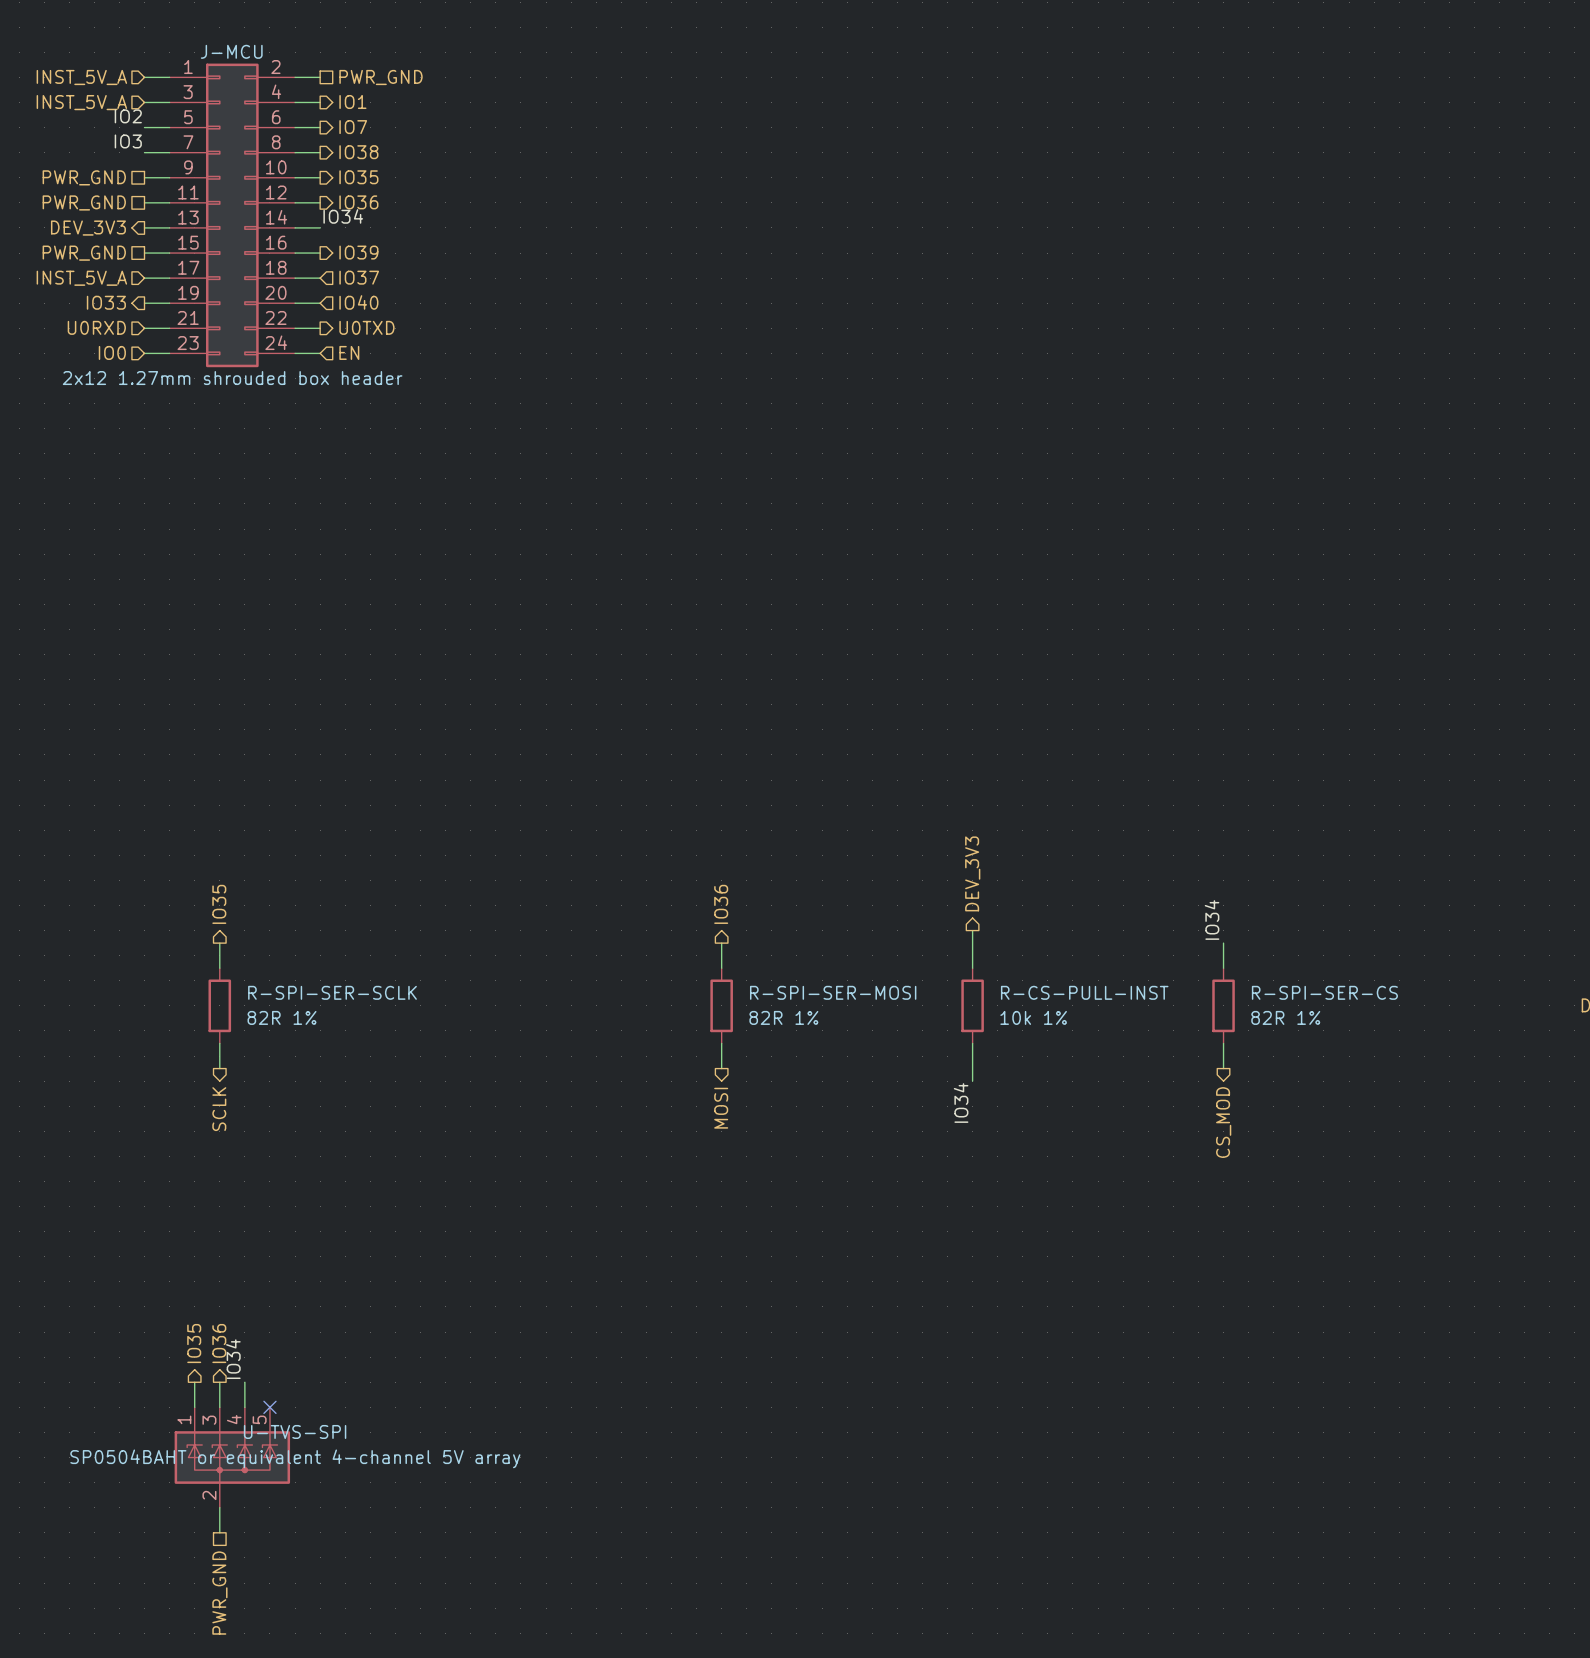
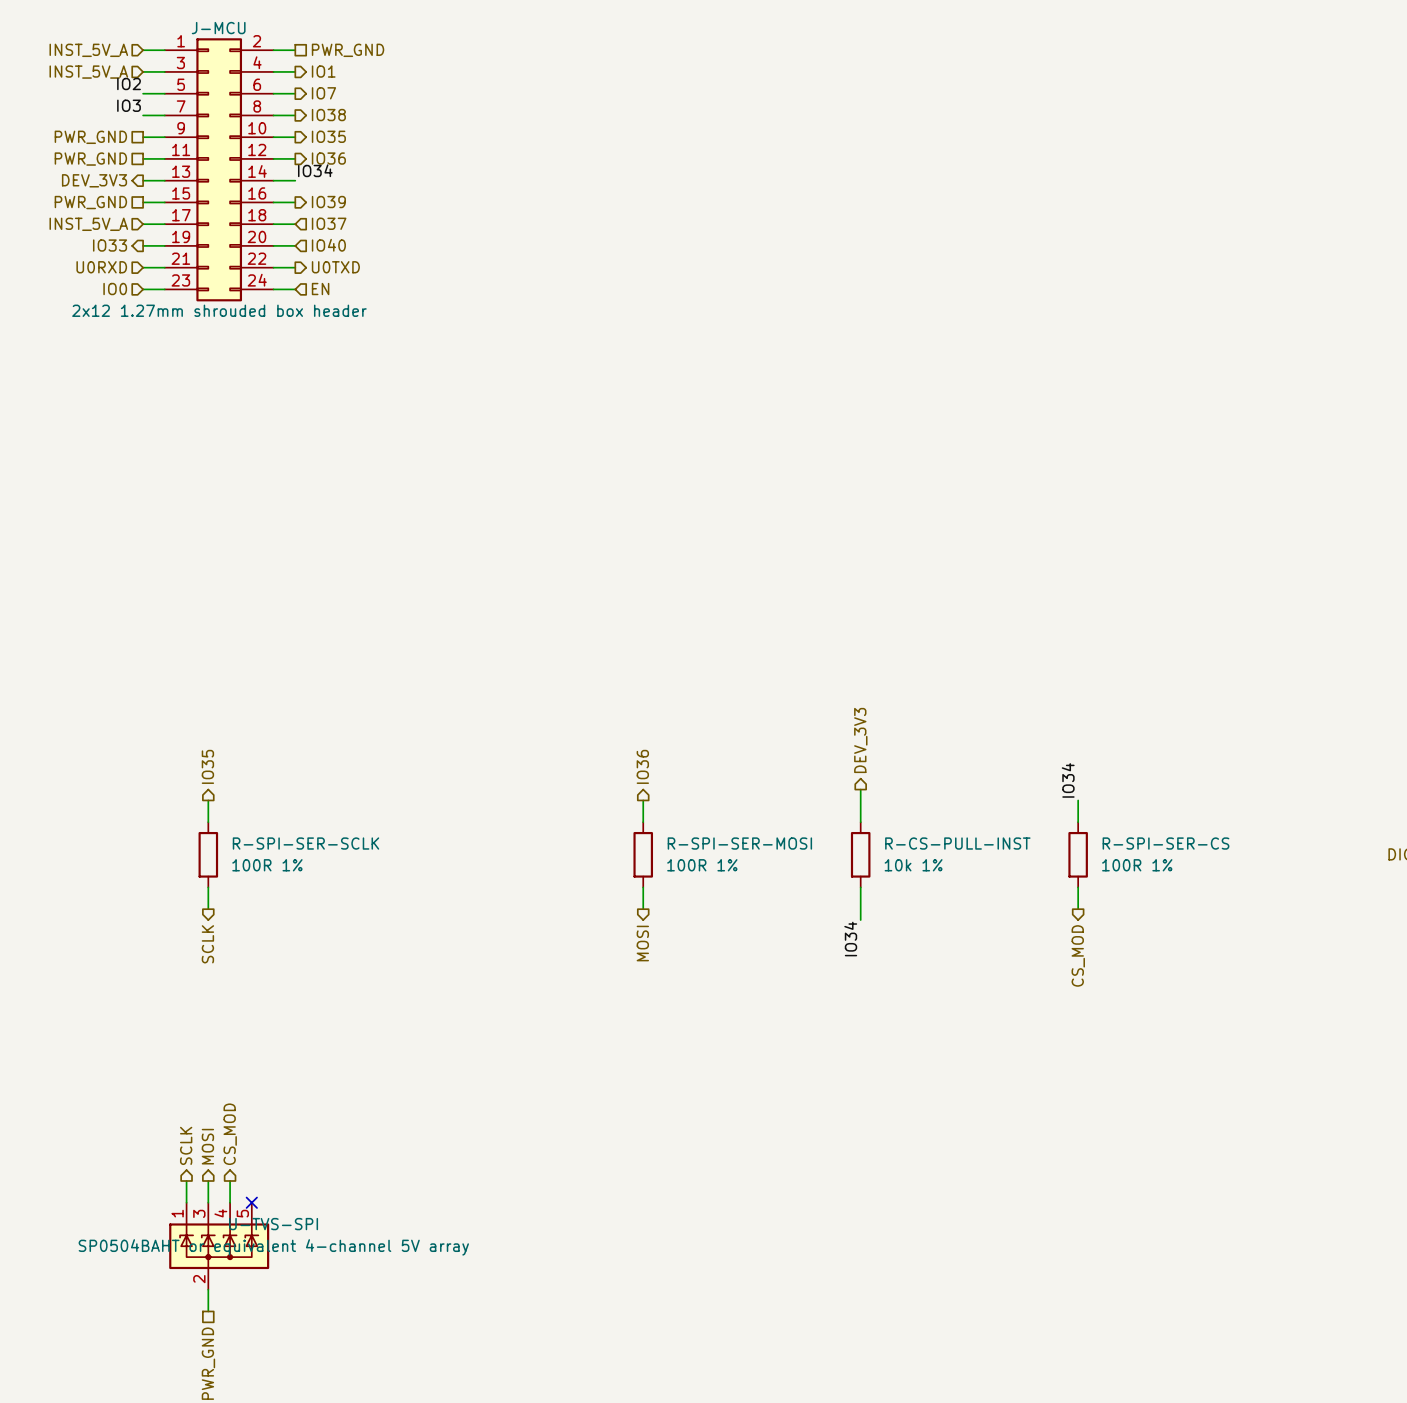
R-SPI-SER-SCLK value: 82R 1% (282, 1017) -> 100R 1% (267, 865)
R-SPI-SER-MOSI value: 82R 1% (783, 1017) -> 100R 1% (702, 865)
R-SPI-SER-CS value: 82R 1% (1285, 1017) -> 100R 1% (1137, 865)
hierarchical label: none -> CS_MOD (230, 1134)
hierarchical label: IO35 (194, 1343) -> SCLK (186, 1145)
hierarchical label: IO36 (219, 1343) -> MOSI (207, 1146)
label: IO34 (233, 1359) -> none

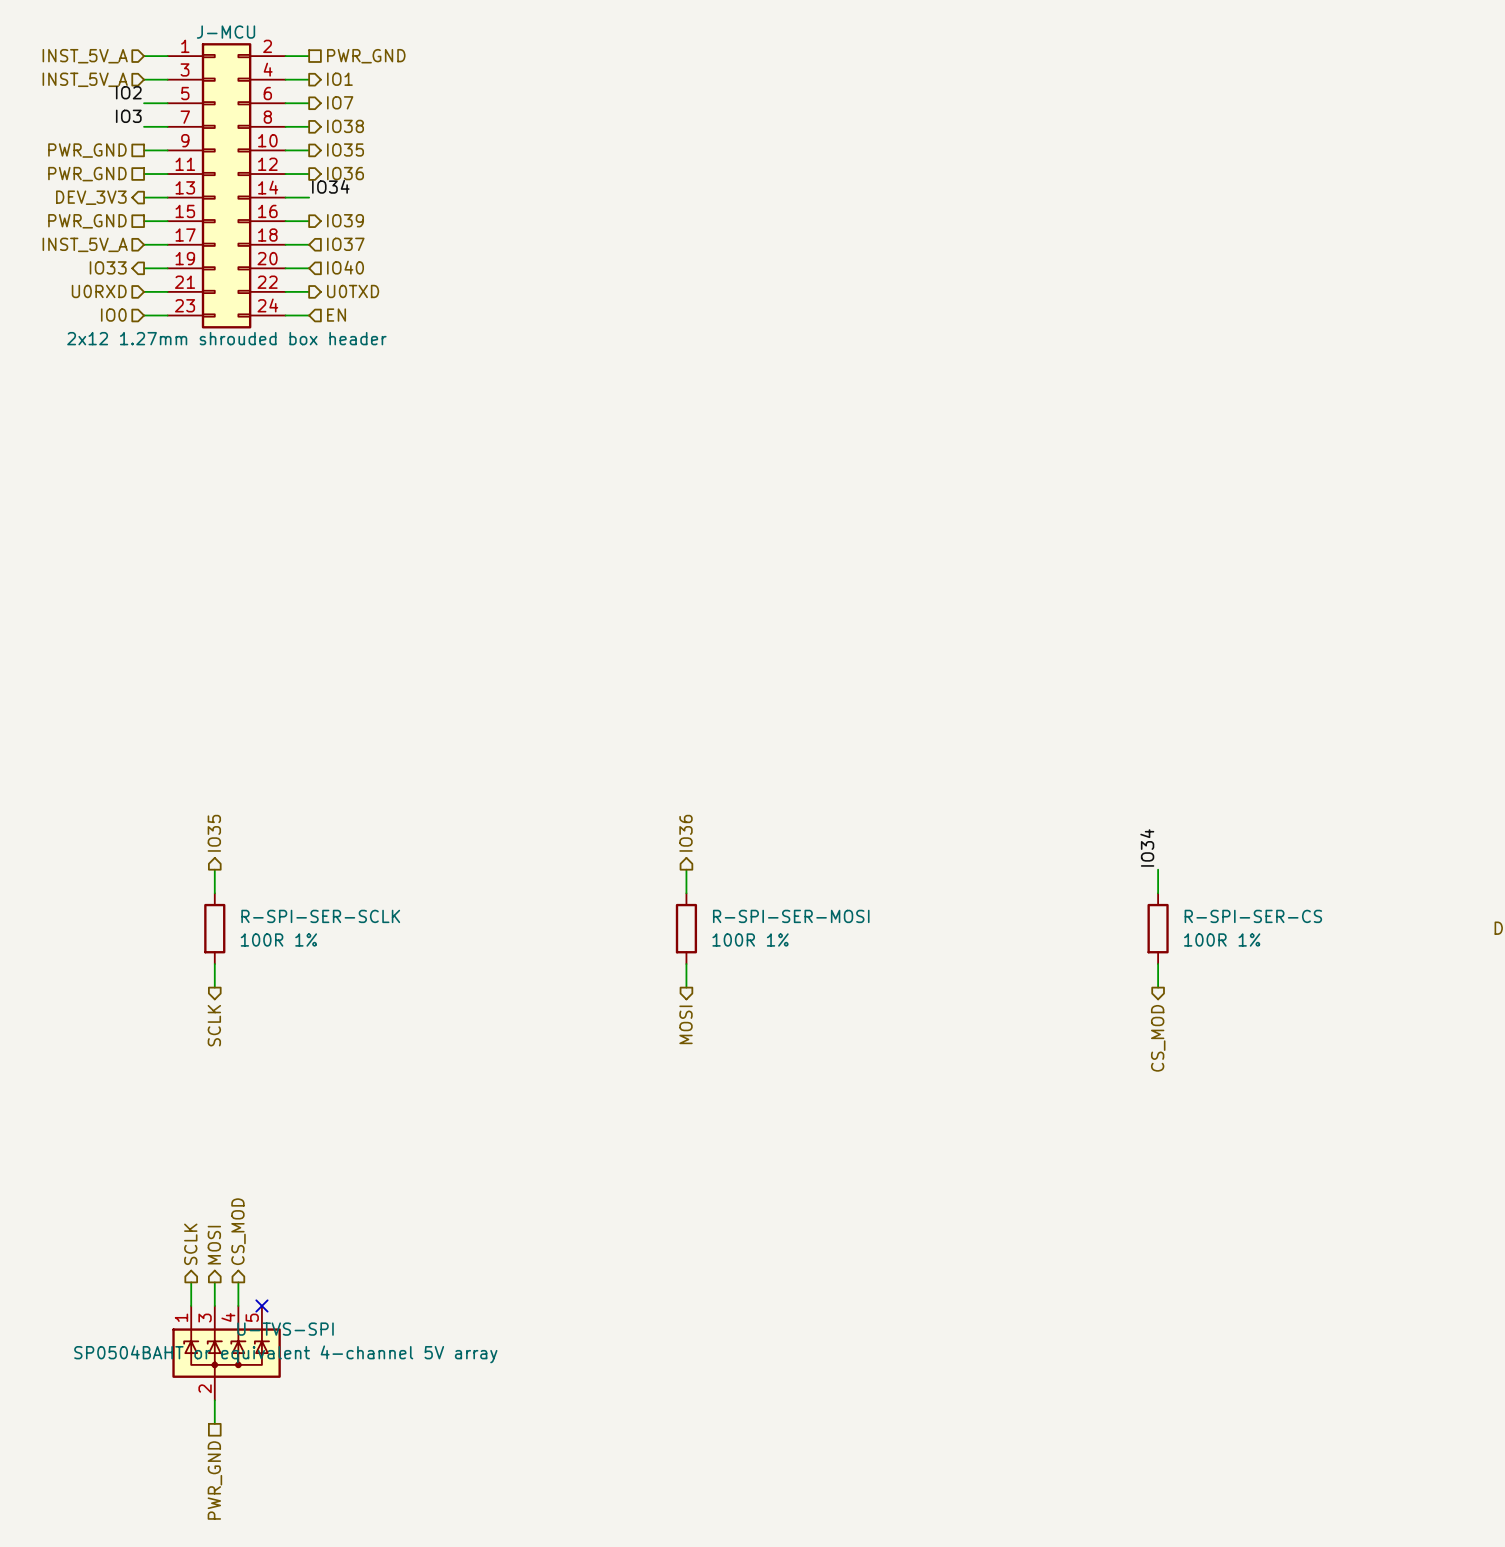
hierarchical label: DEV_3V3 (860, 740) -> none
wire: (860, 789) (860, 822) -> none
R-CS-PULL-INST: 10k 1% (860, 854) -> none
wire: (860, 887) (860, 920) -> none
label: IO34 (850, 939) -> none

